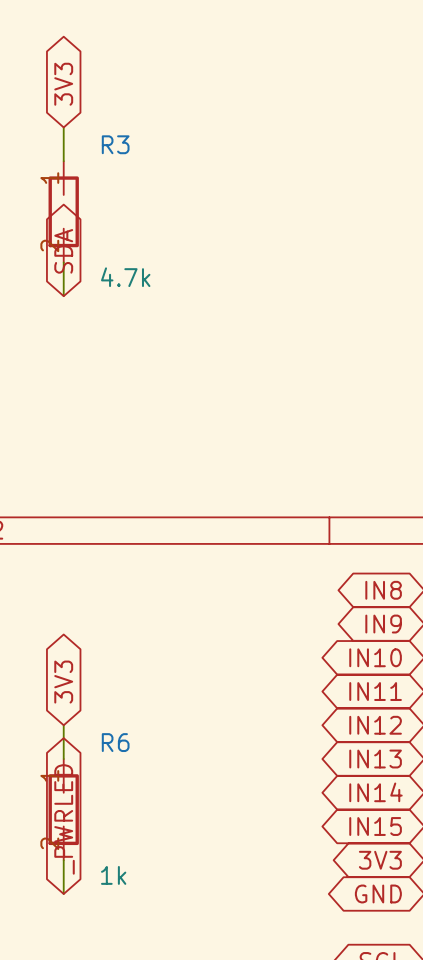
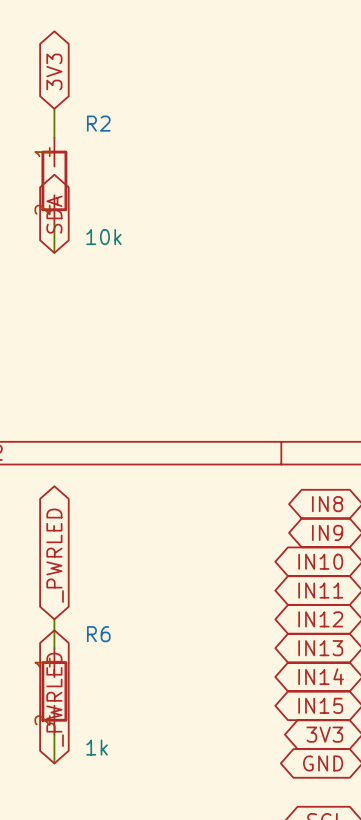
R3 name: R3 (115, 144) -> R2 (98, 123)
R3 value: 4.7k (125, 277) -> 10k (103, 237)
global label: 3V3 (63, 682) -> _PWRLED (55, 555)

